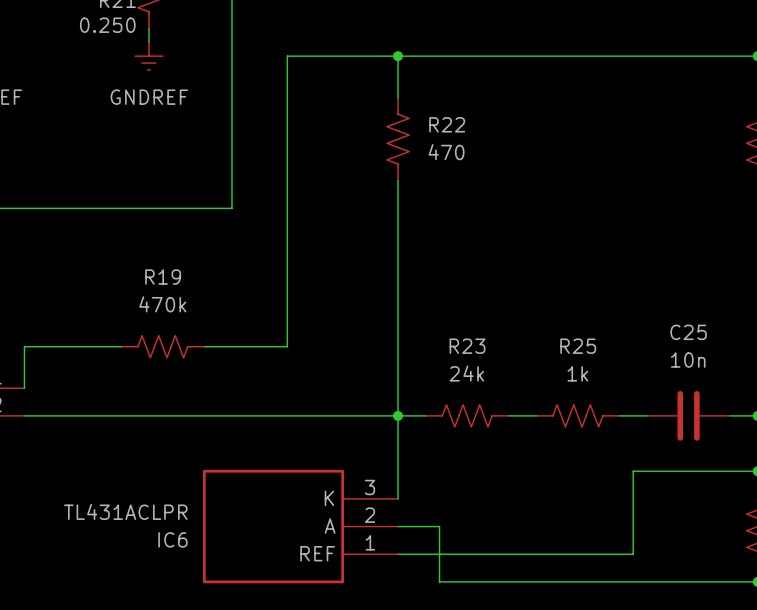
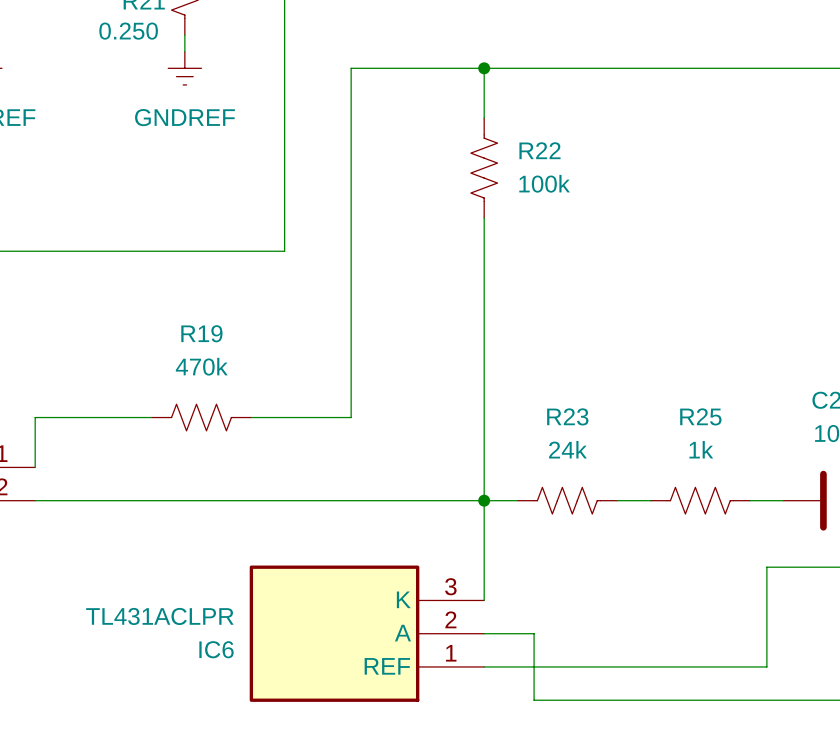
R22 value: 470 (446, 152) -> 100k (544, 183)

